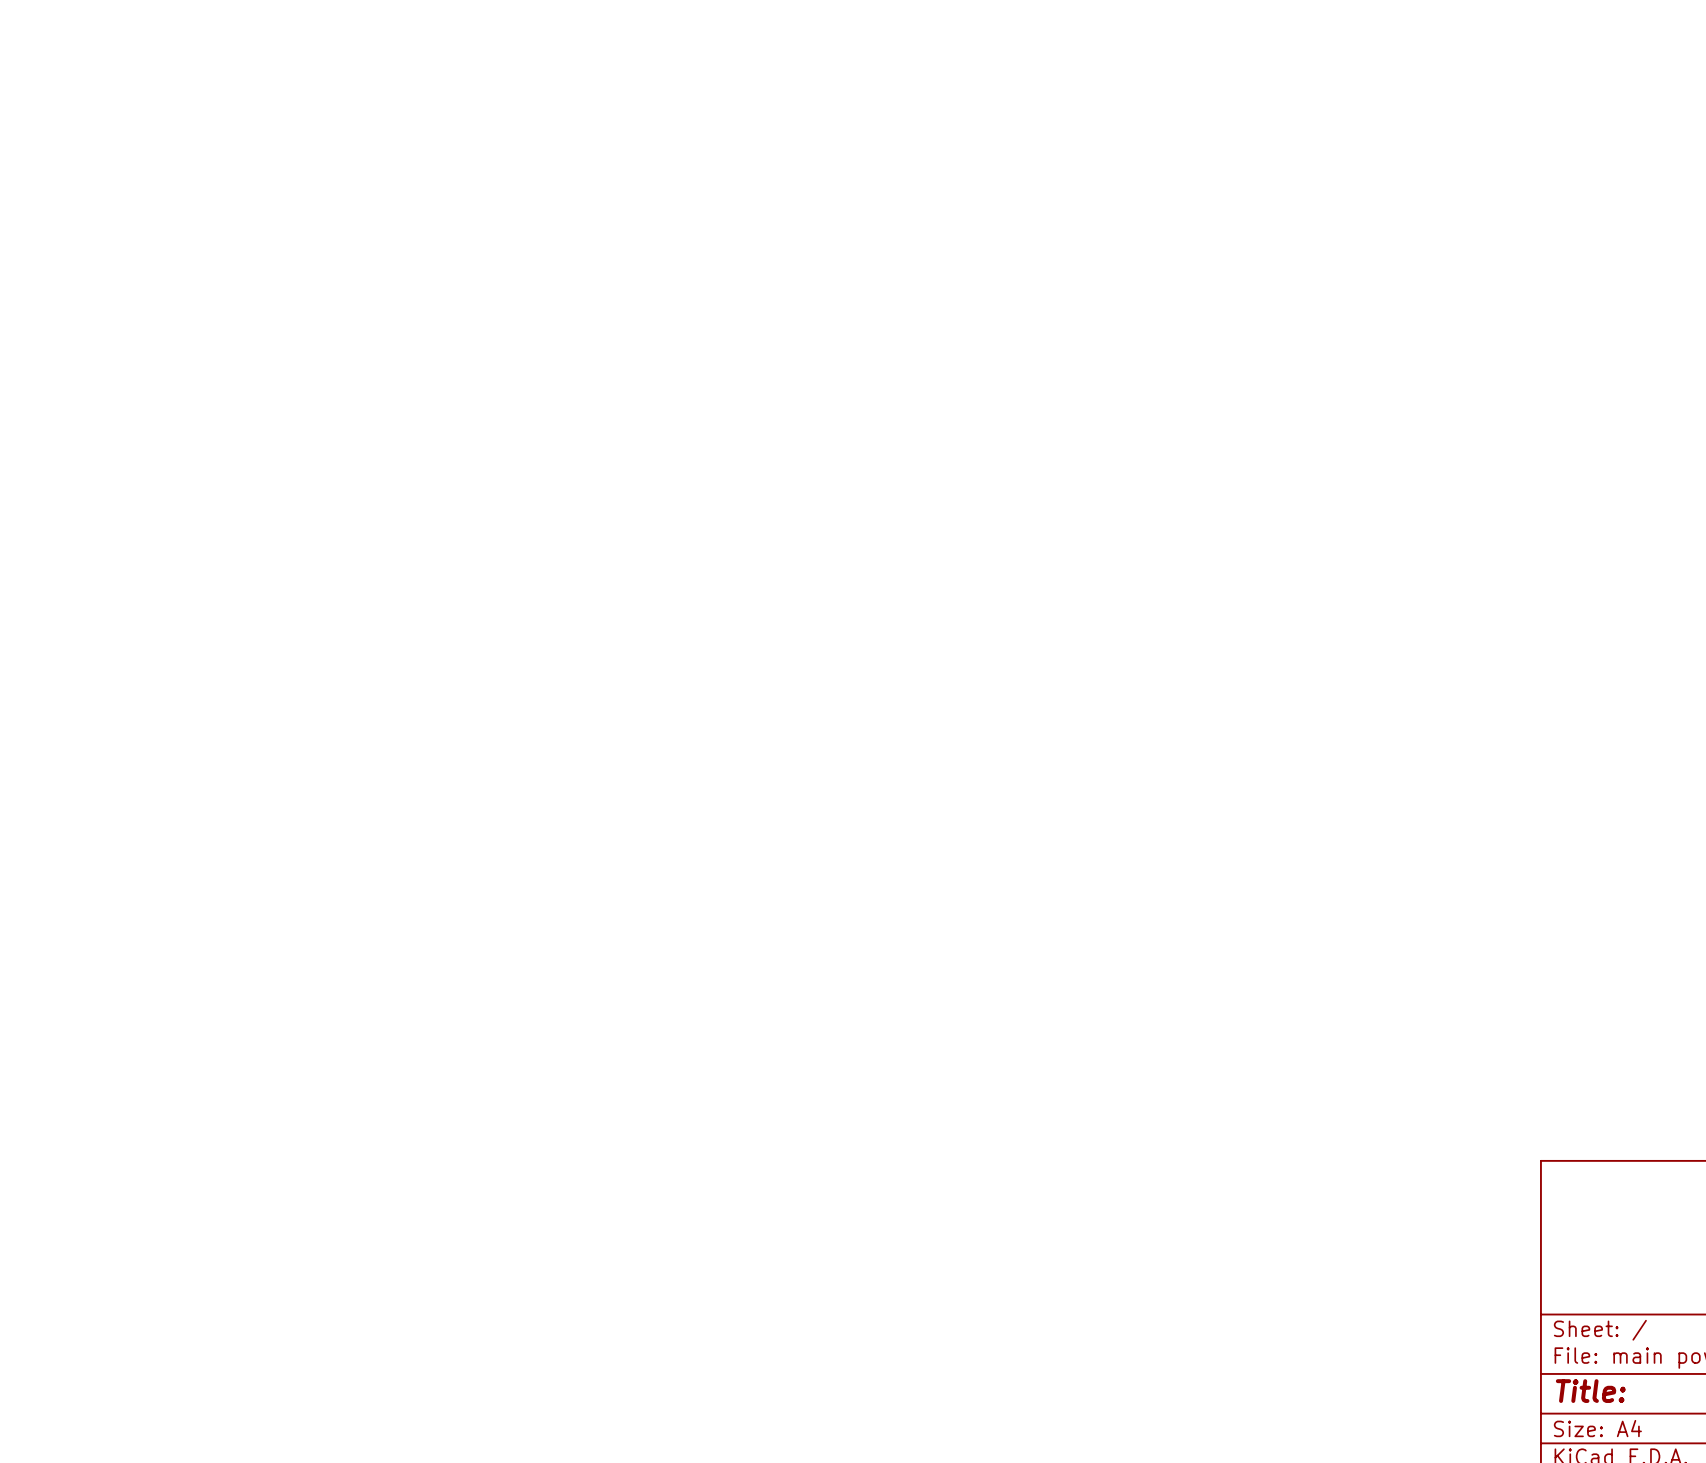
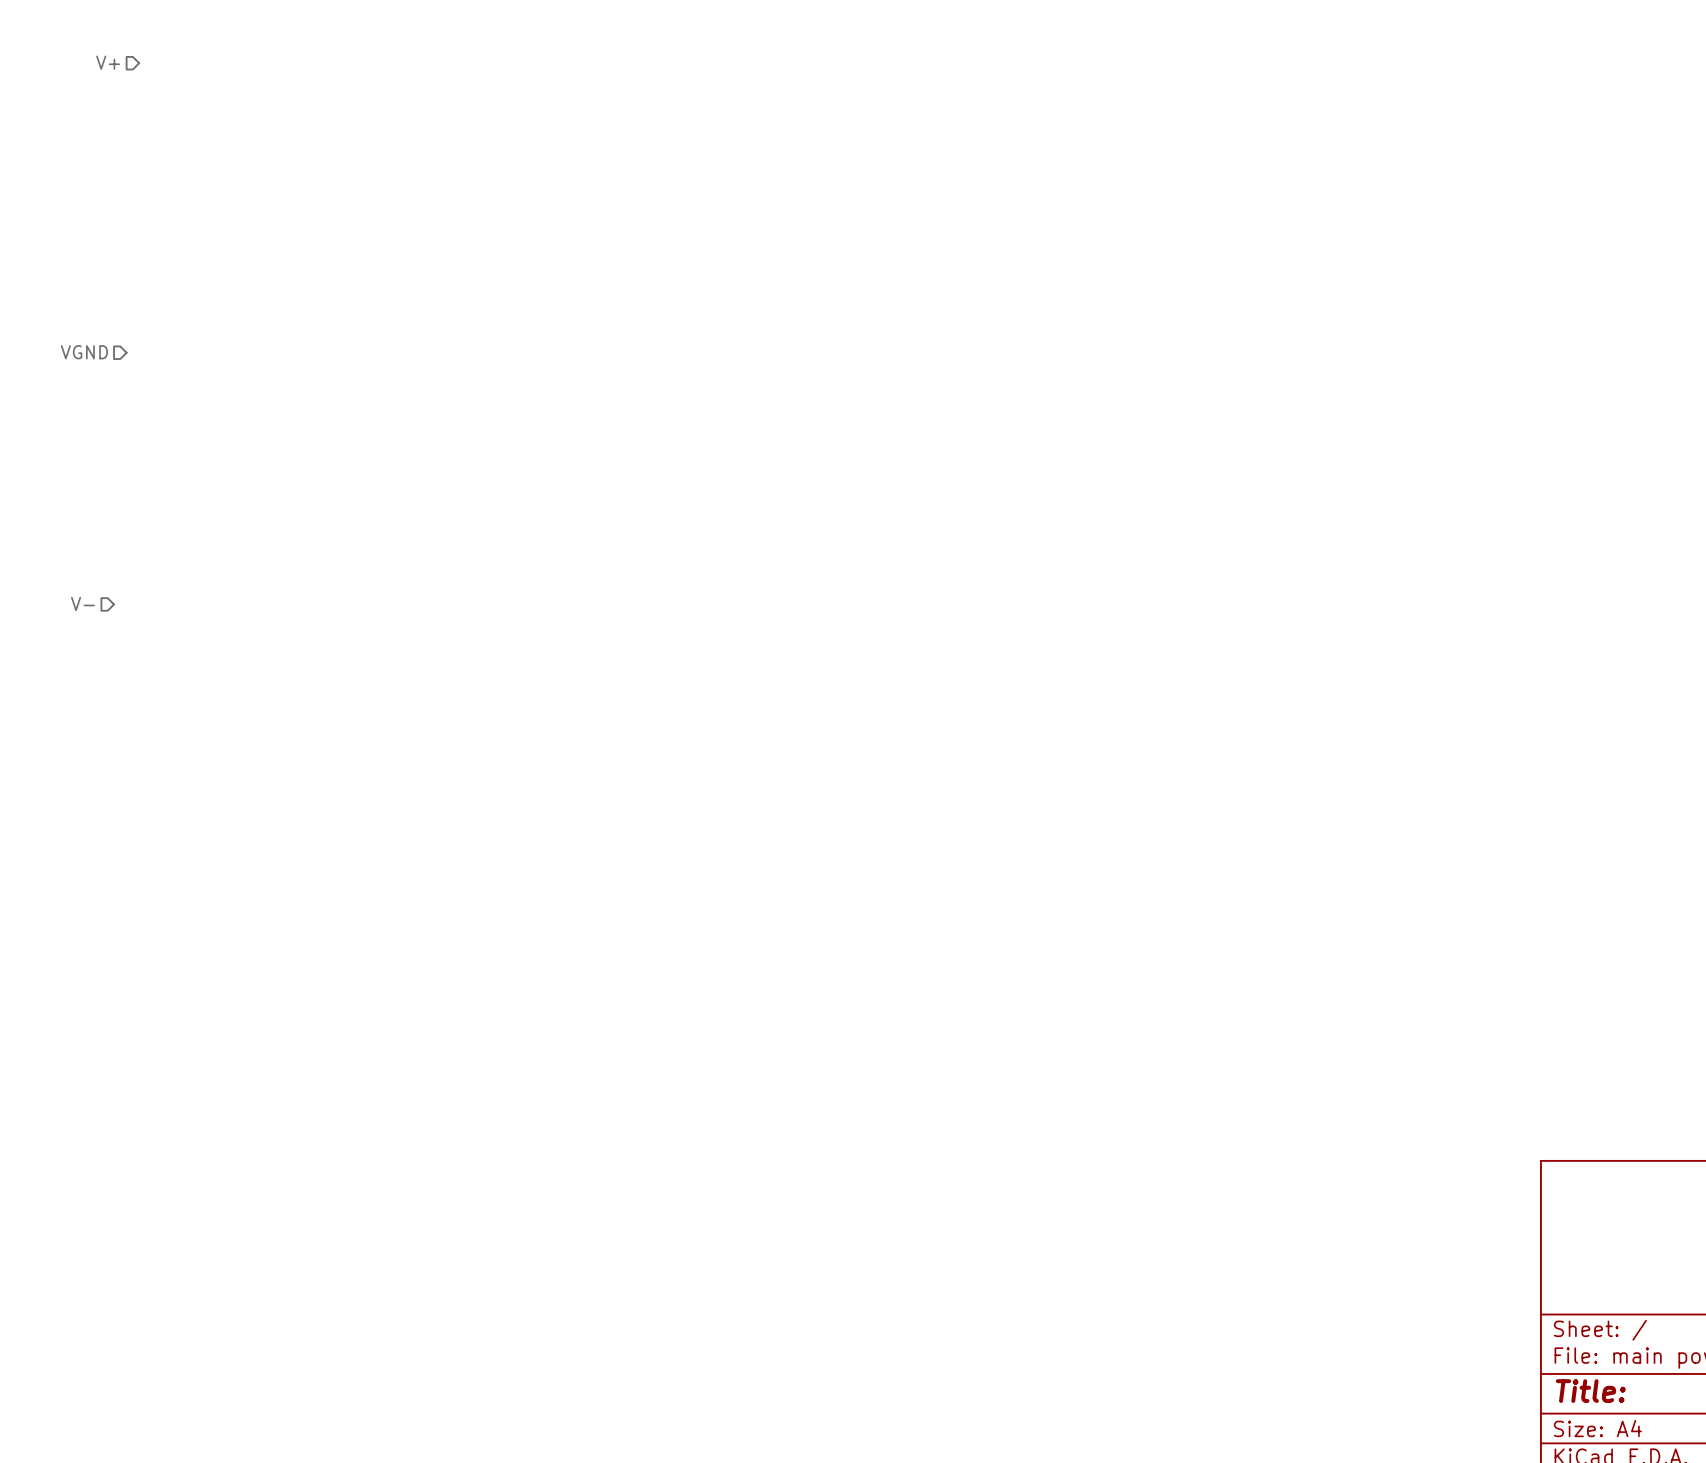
hierarchical label: none -> V+ (108, 62)
hierarchical label: none -> VGND (84, 352)
hierarchical label: none -> V- (82, 603)

